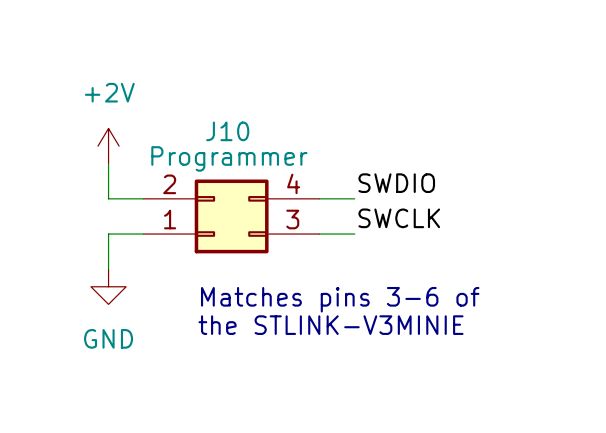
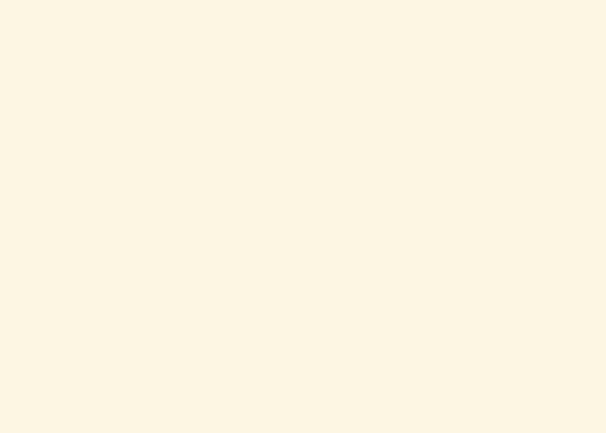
power symbol: +2V (108, 146) -> none
wire: (108, 163) (108, 198) (143, 198) -> none
label: SWDIO (396, 183) -> none
wire: (319, 198) (354, 198) -> none
J10: Programmer (231, 216) -> none
label: SWCLK (399, 218) -> none
wire: (143, 234) (108, 234) (108, 269) -> none
wire: (319, 234) (354, 234) -> none
power symbol: GND (108, 286) -> none
text: Matches pins 3-6 of (340, 299) -> none
text: the STLINK-V3MINIE (331, 325) -> none

